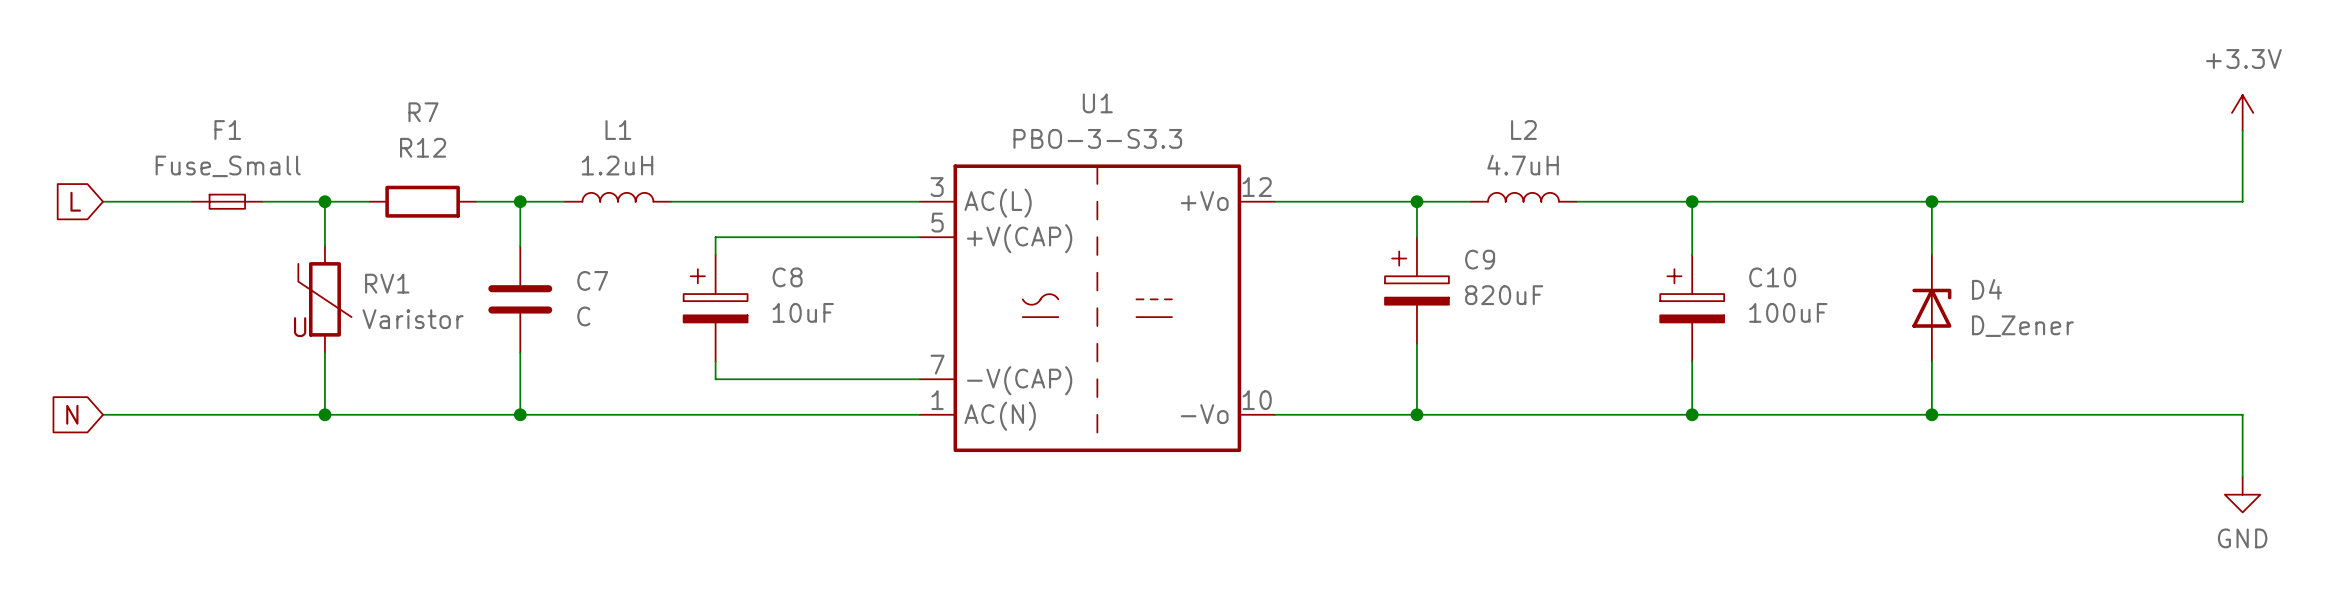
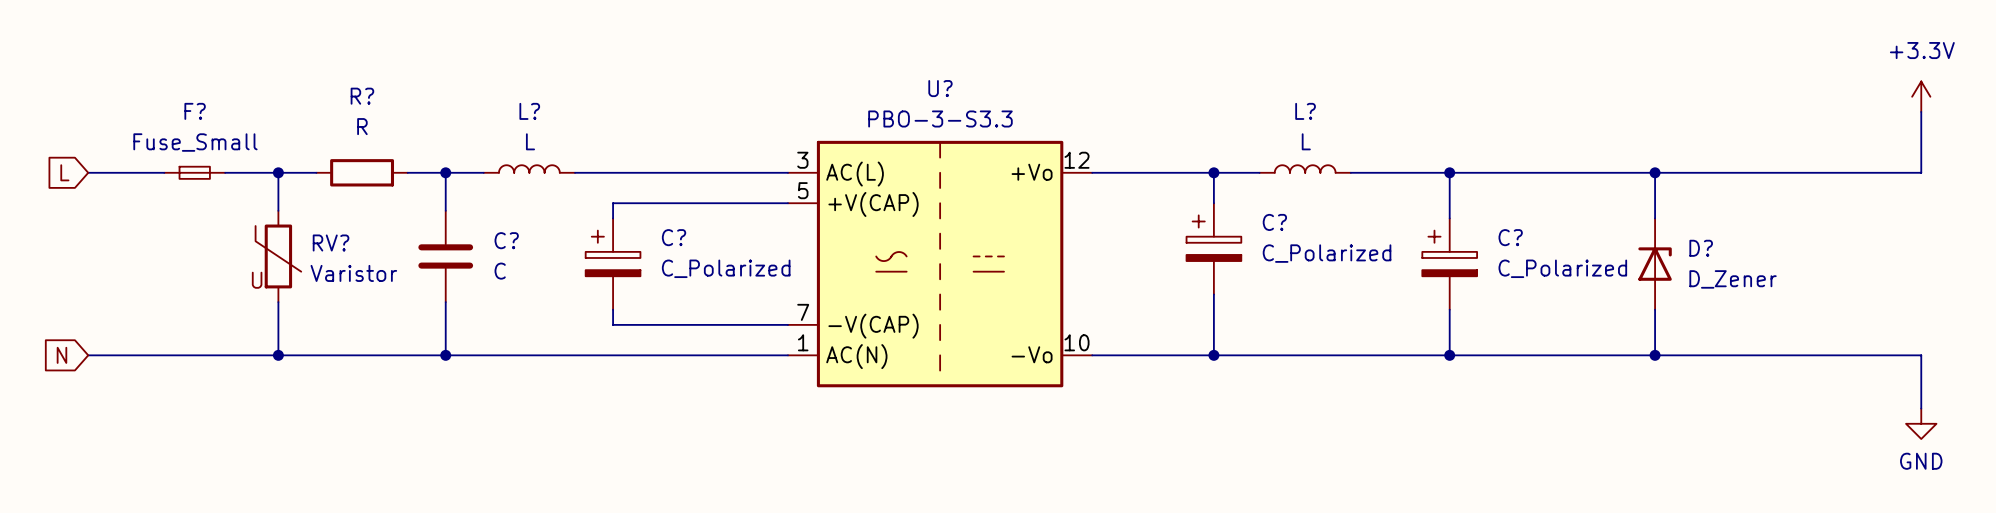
U1 name: U1 (1097, 103) -> U? (940, 88)
R7 name: R7 (423, 112) -> R? (362, 96)
F1 name: F1 (227, 130) -> F? (195, 111)
L1 name: L1 (618, 130) -> L? (529, 111)
L2 name: L2 (1523, 130) -> L? (1305, 111)
R7 value: R12 (423, 147) -> R (362, 126)
L1 value: 1.2uH (617, 165) -> L (530, 141)
L2 value: 4.7uH (1523, 165) -> L (1306, 141)
C9 name: C9 (1480, 259) -> C? (1274, 222)
C8 name: C8 (787, 277) -> C? (674, 237)
C10 name: C10 (1772, 277) -> C? (1510, 237)
C7 name: C7 (592, 280) -> C? (506, 240)
RV1 name: RV1 (387, 283) -> RV? (331, 243)
D4 name: D4 (1986, 289) -> D? (1701, 248)
C9 value: 820uF (1504, 295) -> C_Polarized (1327, 253)
C8 value: 10uF (803, 312) -> C_Polarized (726, 268)
C10 value: 100uF (1788, 312) -> C_Polarized (1562, 268)

